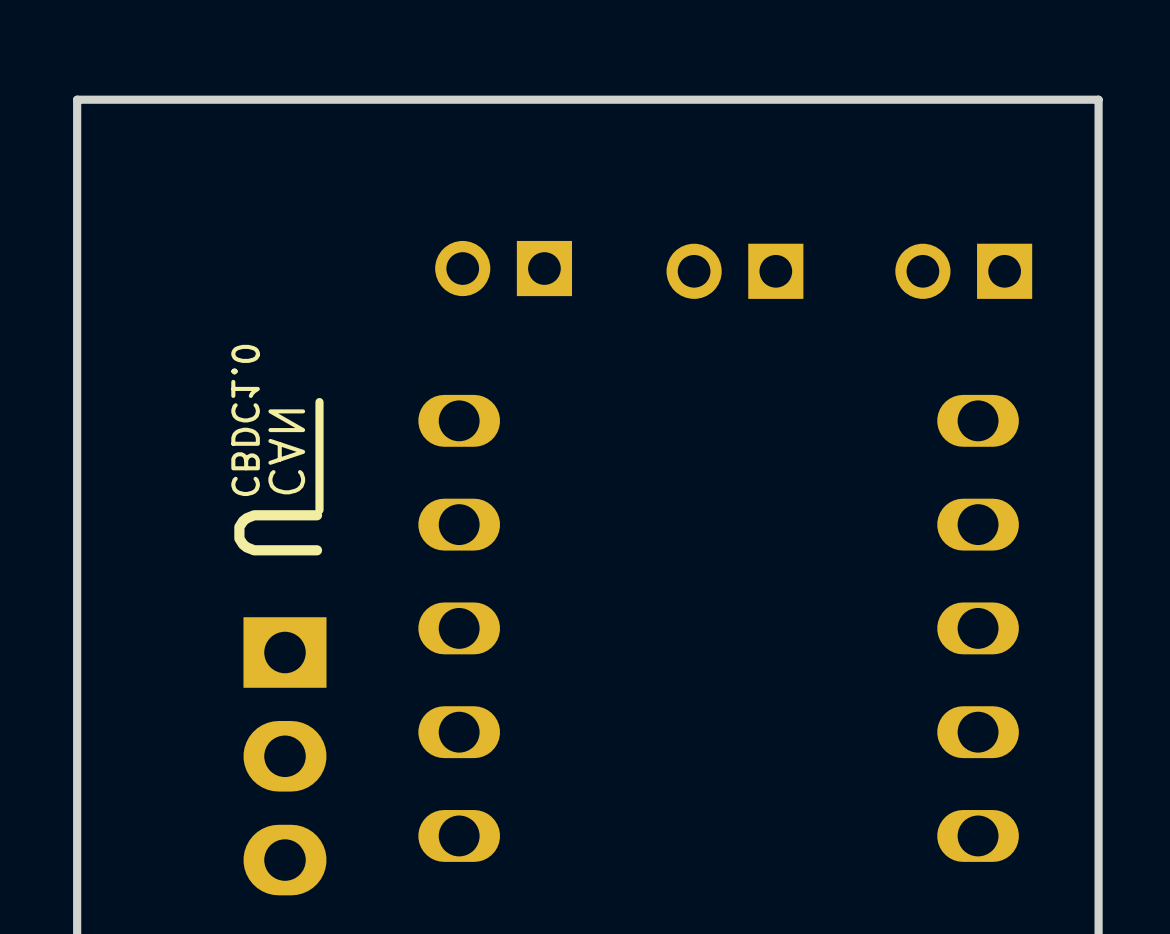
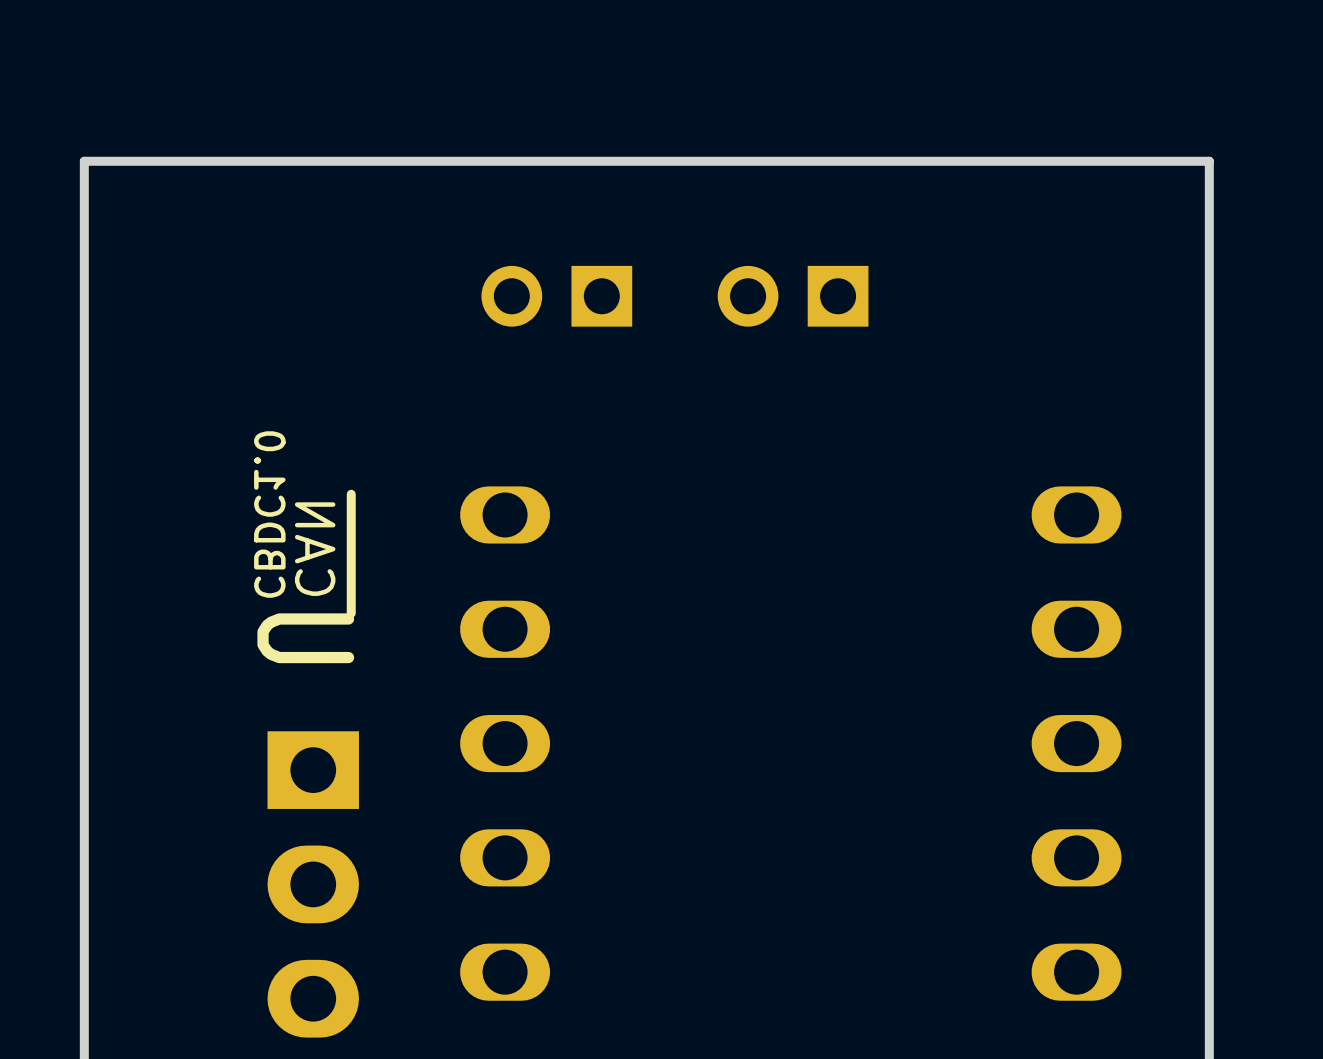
part position: (503, 268) -> (556, 296)
part position: (734, 271) -> (793, 296)
part: (963, 271) -> none

